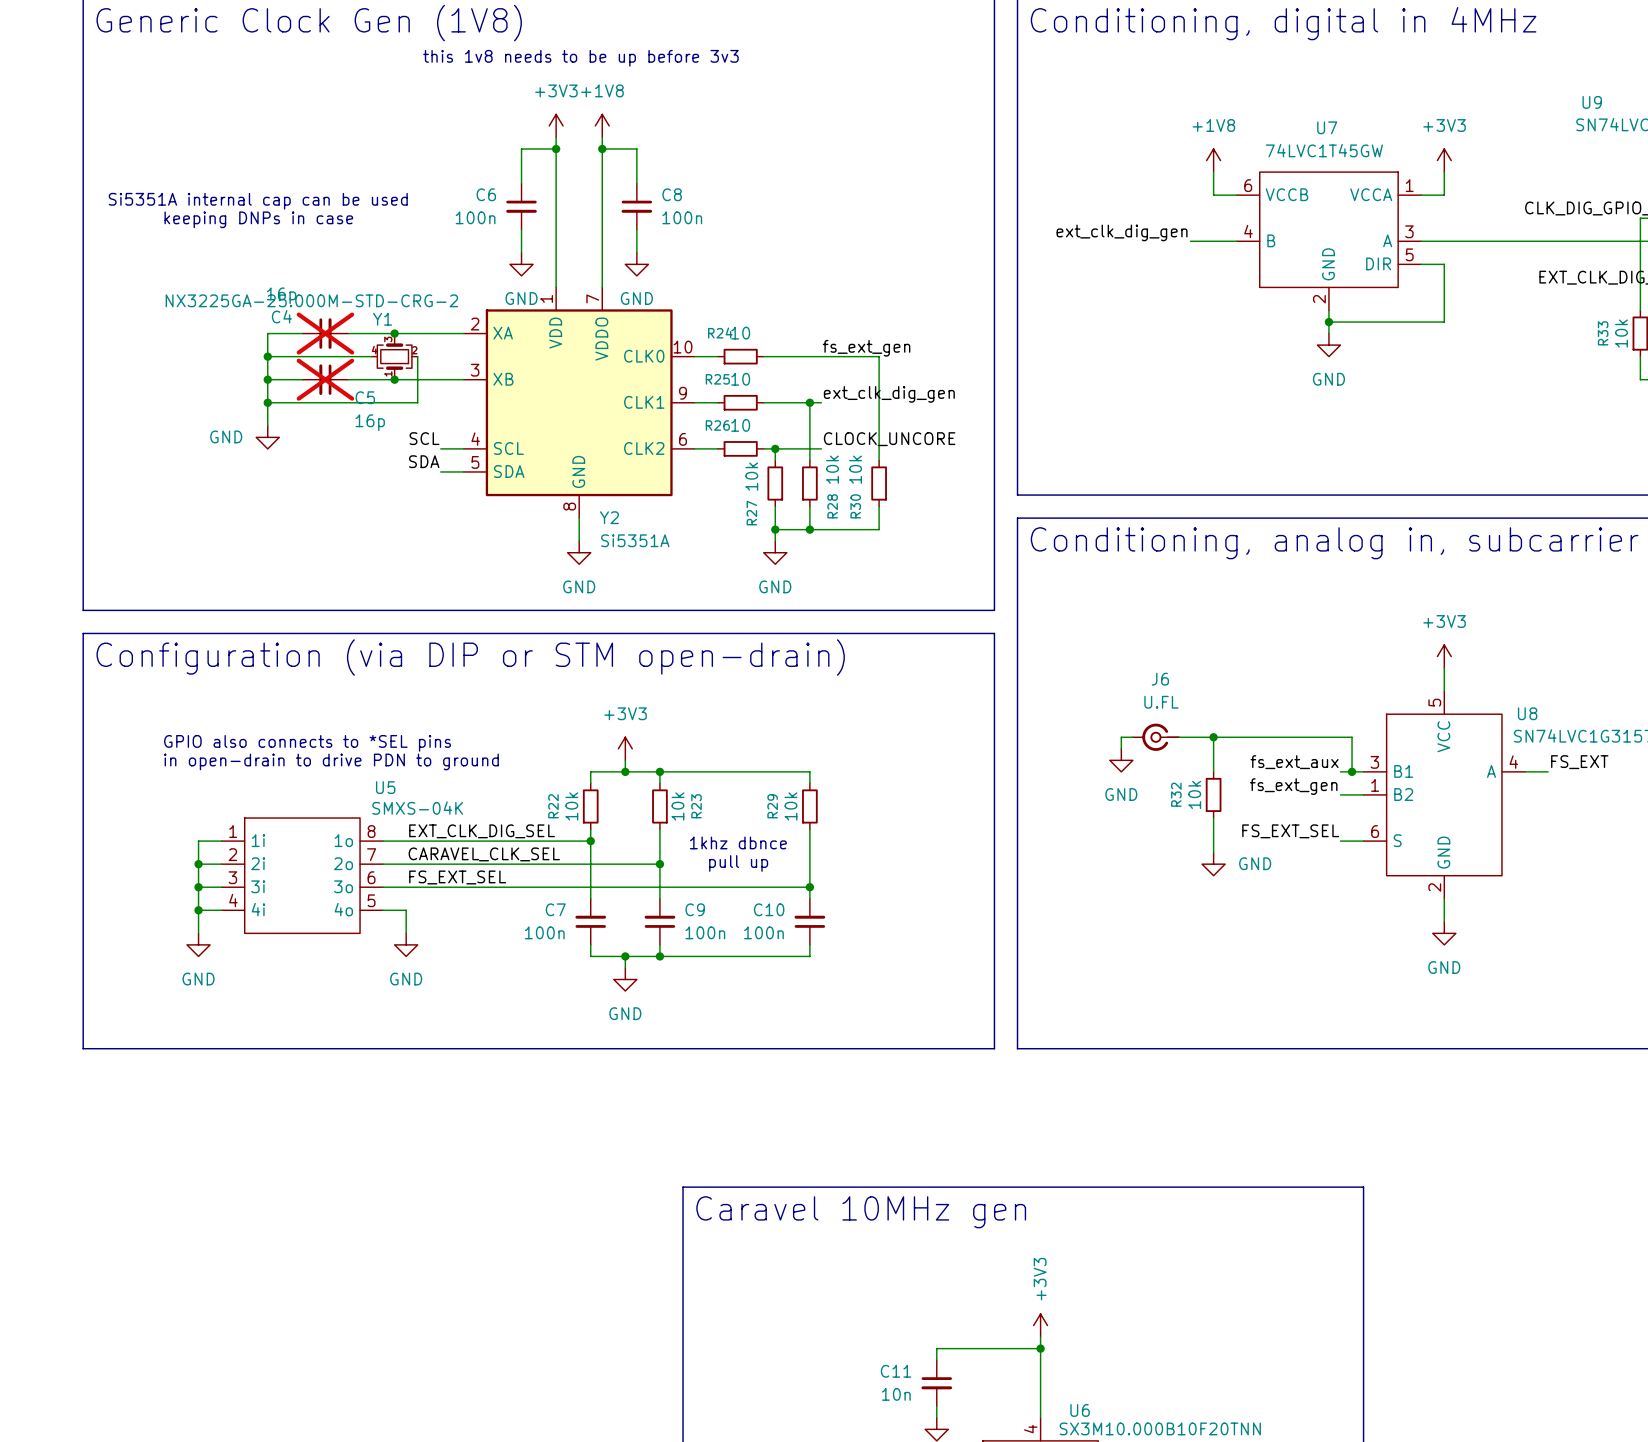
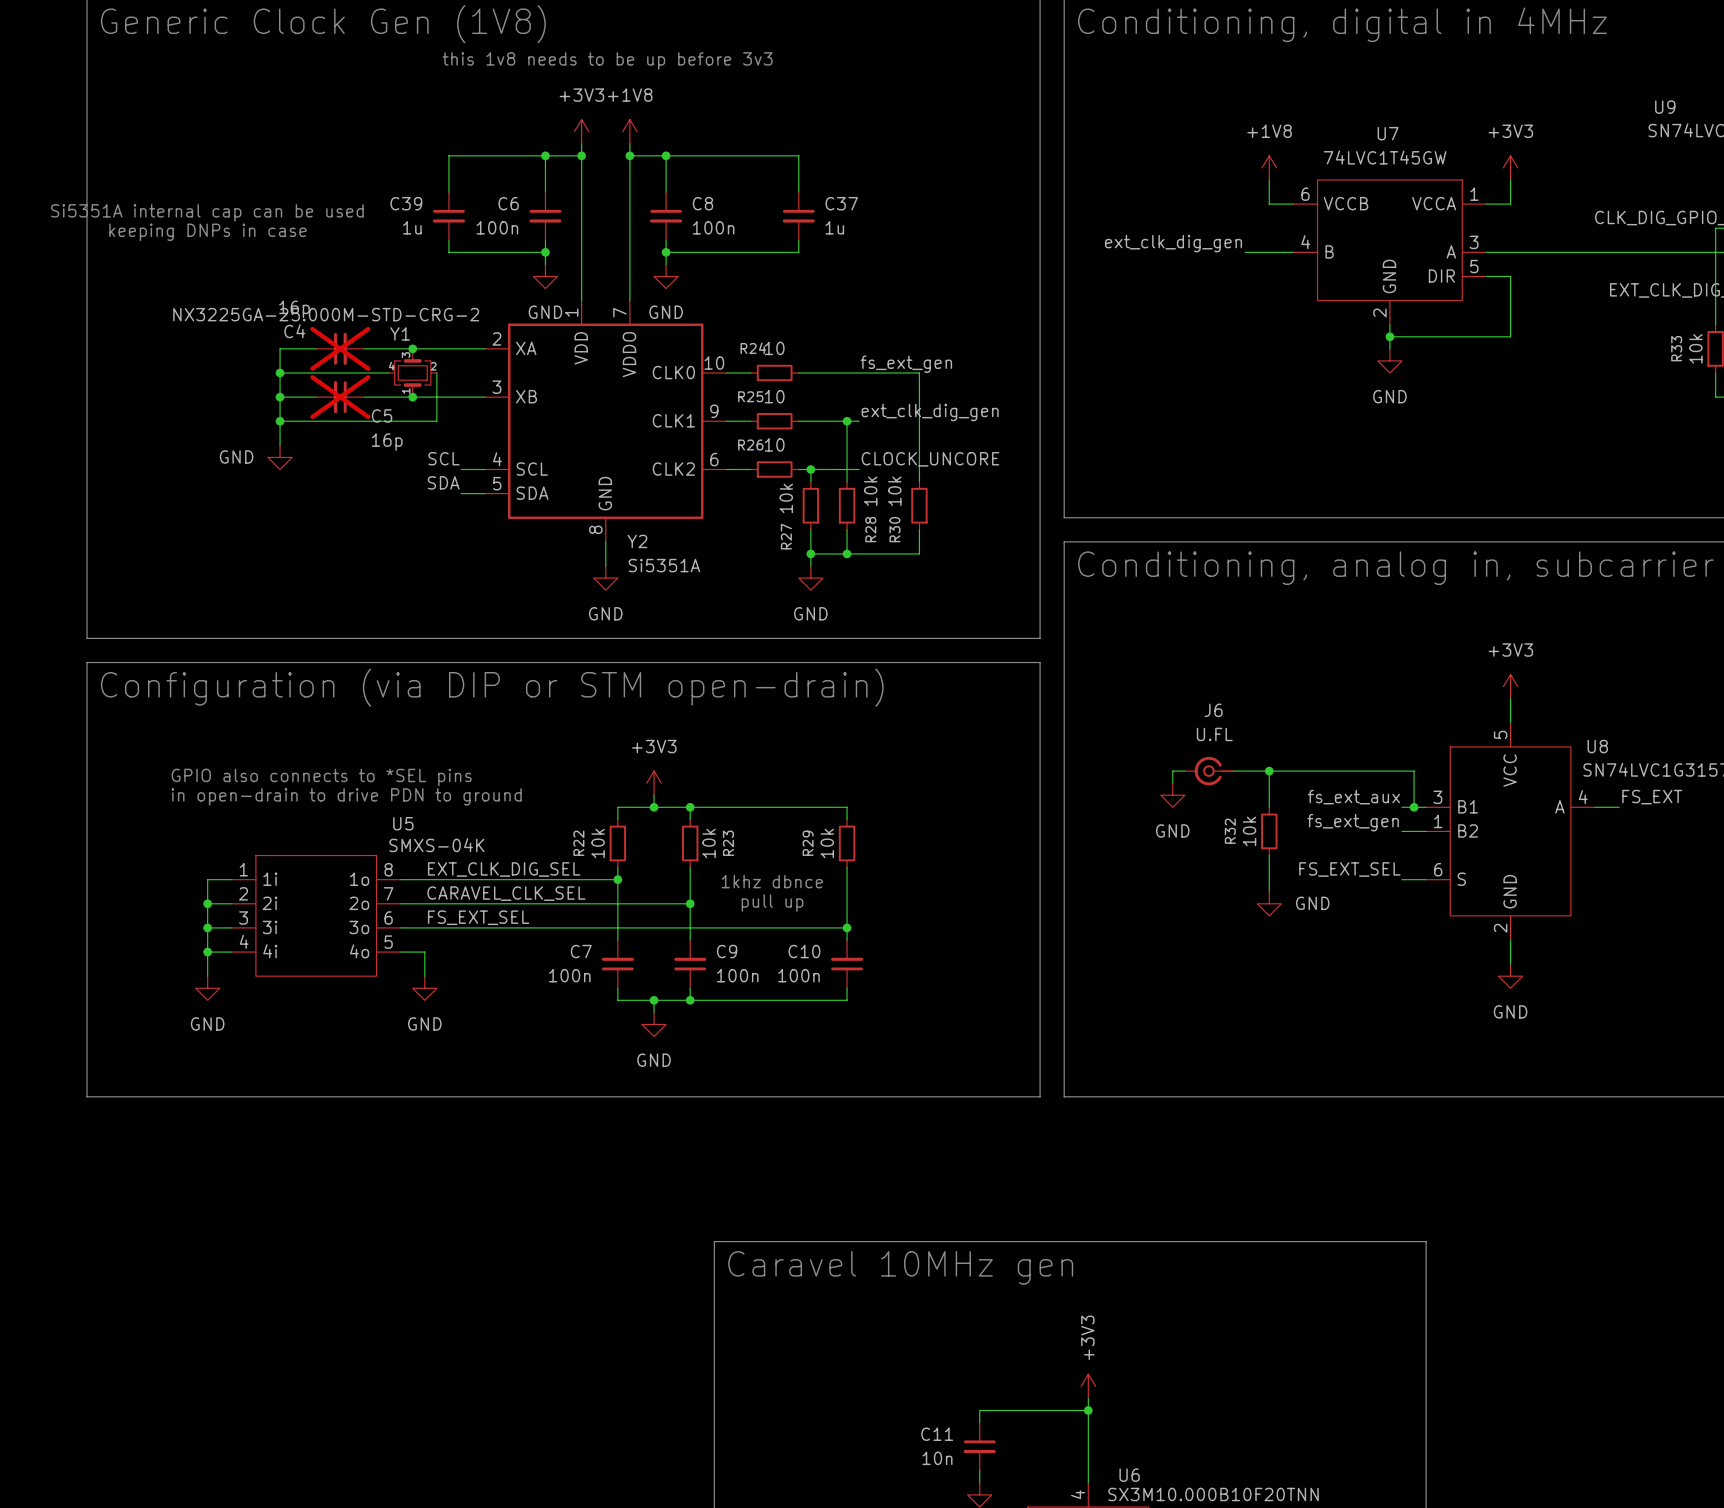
wire: none -> (545, 155) (448, 155) (448, 192)
junction: none -> (545, 155)
wire: none -> (666, 155) (798, 155) (798, 192)
junction: none -> (666, 155)
text position: Si5351A internal cap can be used (258, 201) -> Si5351A internal cap can be used (207, 212)
C39: none -> 1u (448, 216)
C37: none -> 1u (798, 216)
text position: keeping DNPs in case (258, 219) -> keeping DNPs in case (207, 232)
wire: none -> (448, 240) (448, 252) (545, 252)
wire: none -> (798, 240) (798, 252) (666, 252)
junction: none -> (545, 252)
junction: none -> (666, 252)

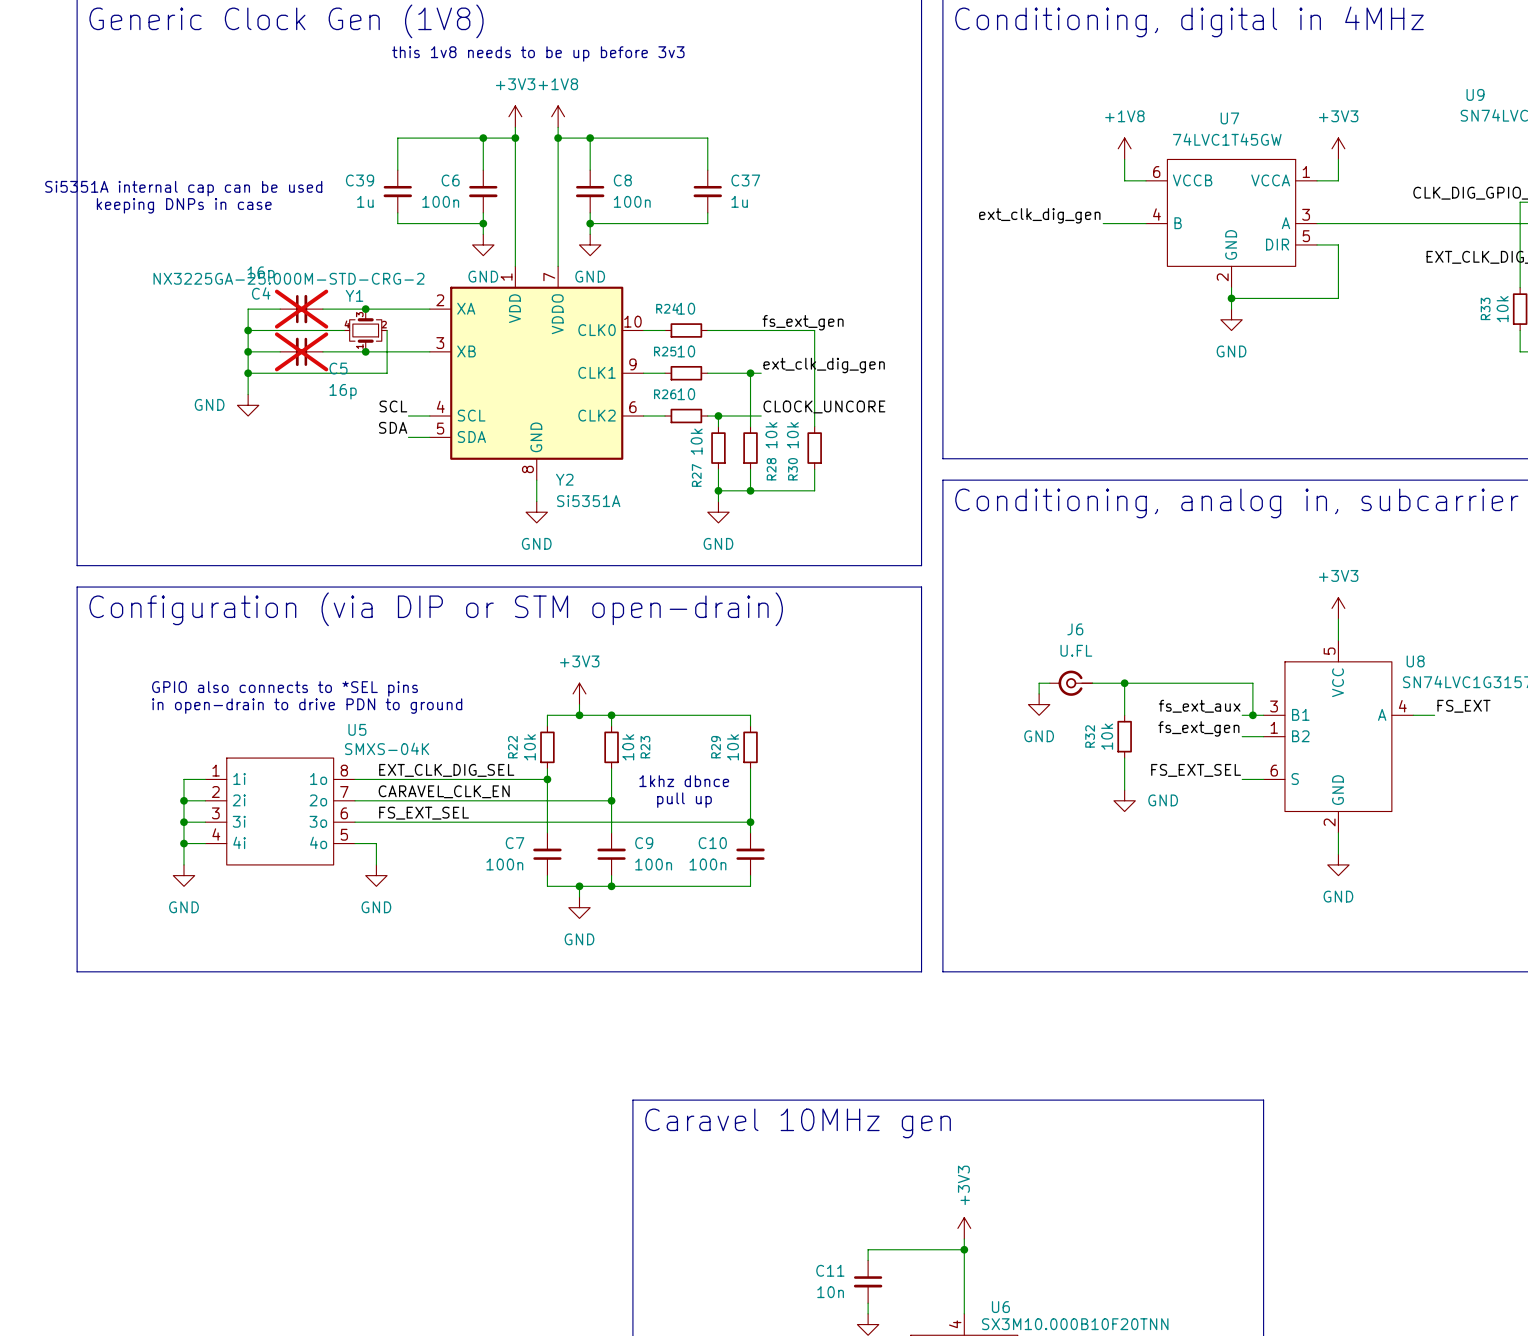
label: CARAVEL_CLK_SEL (506, 893) -> CARAVEL_CLK_EN (444, 791)

